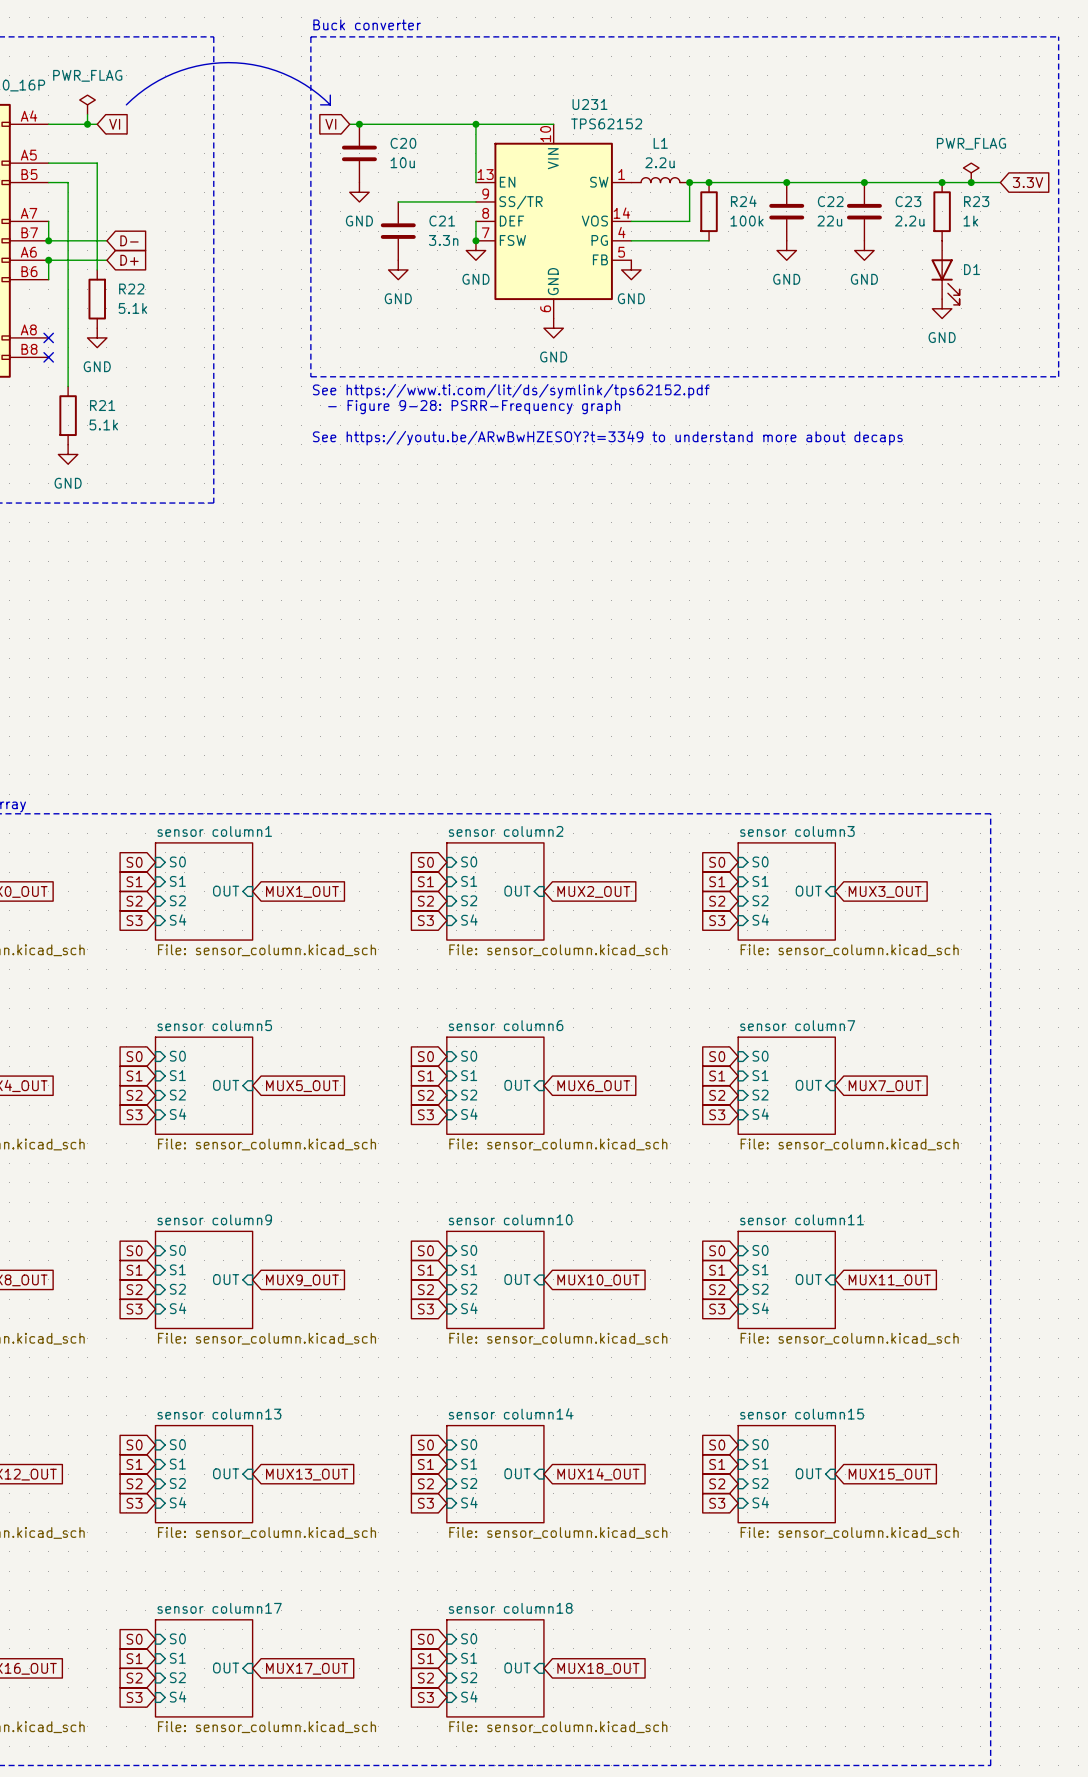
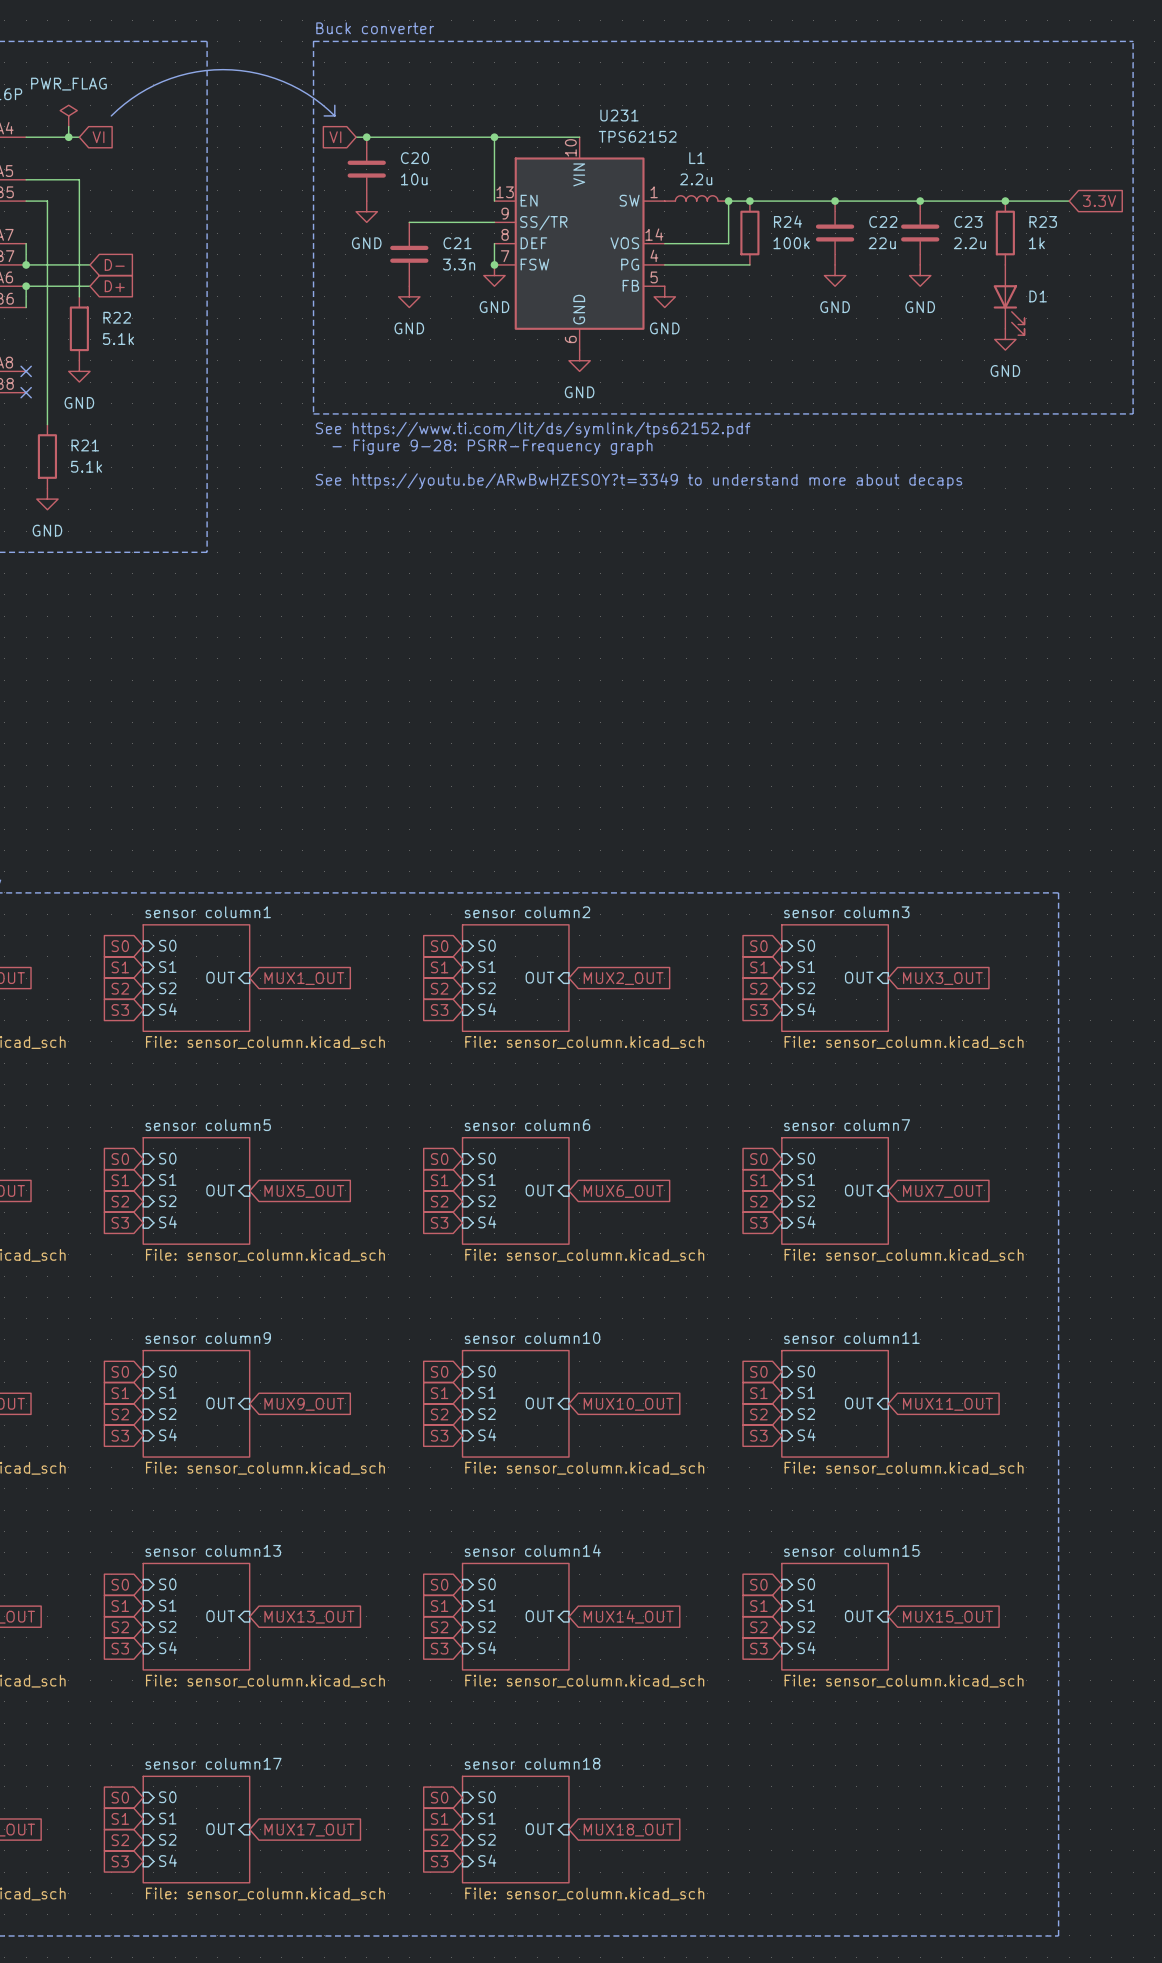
power symbol: PWR_FLAG (971, 172) -> none
junction: (971, 182) -> none

